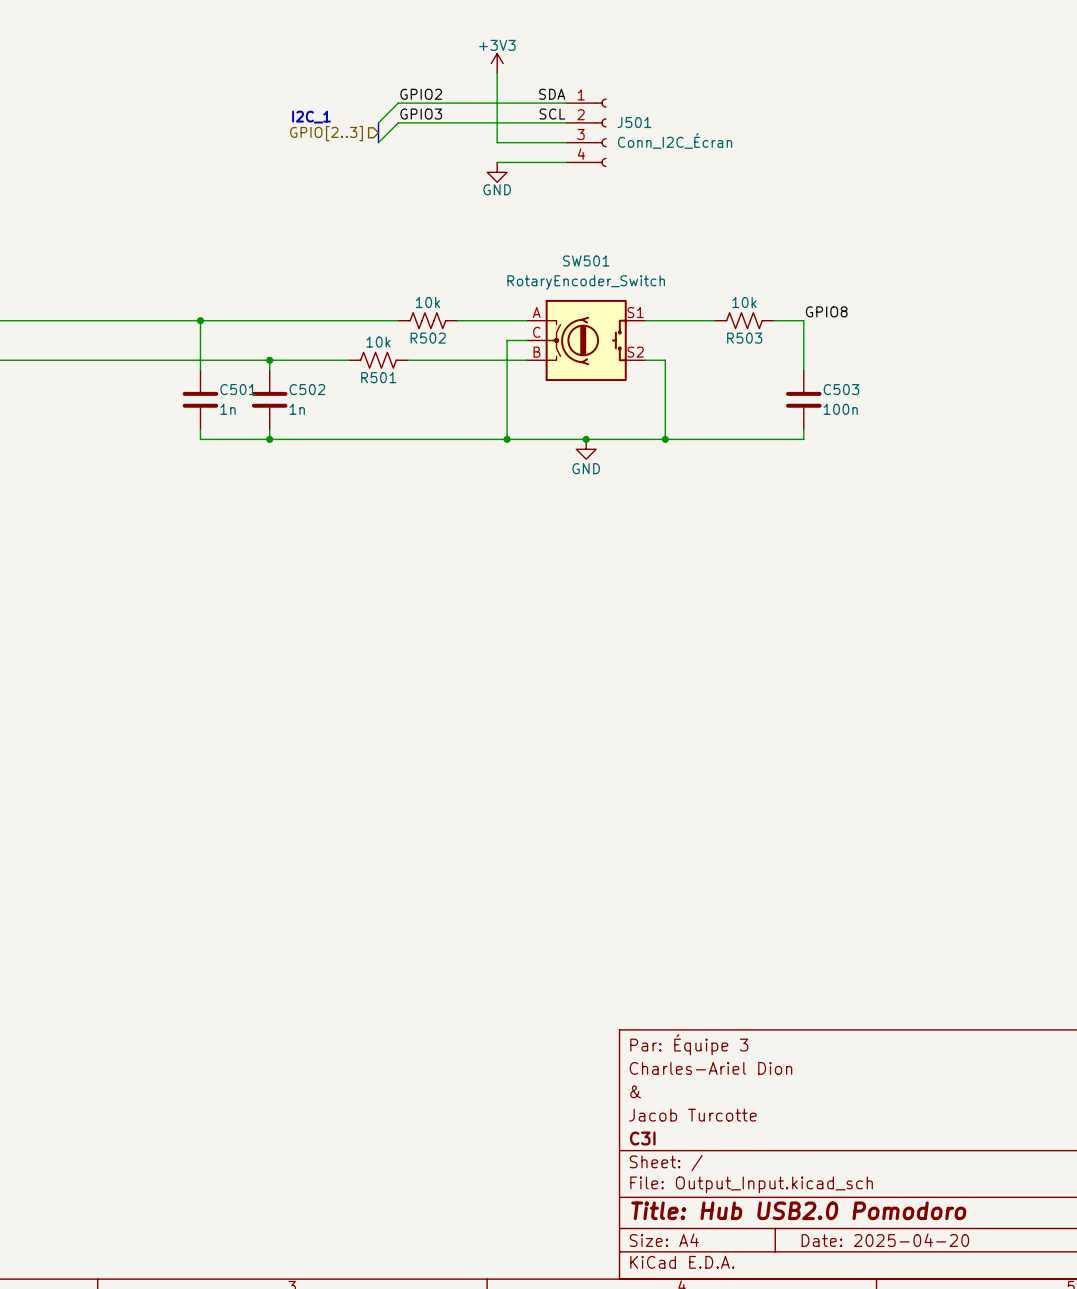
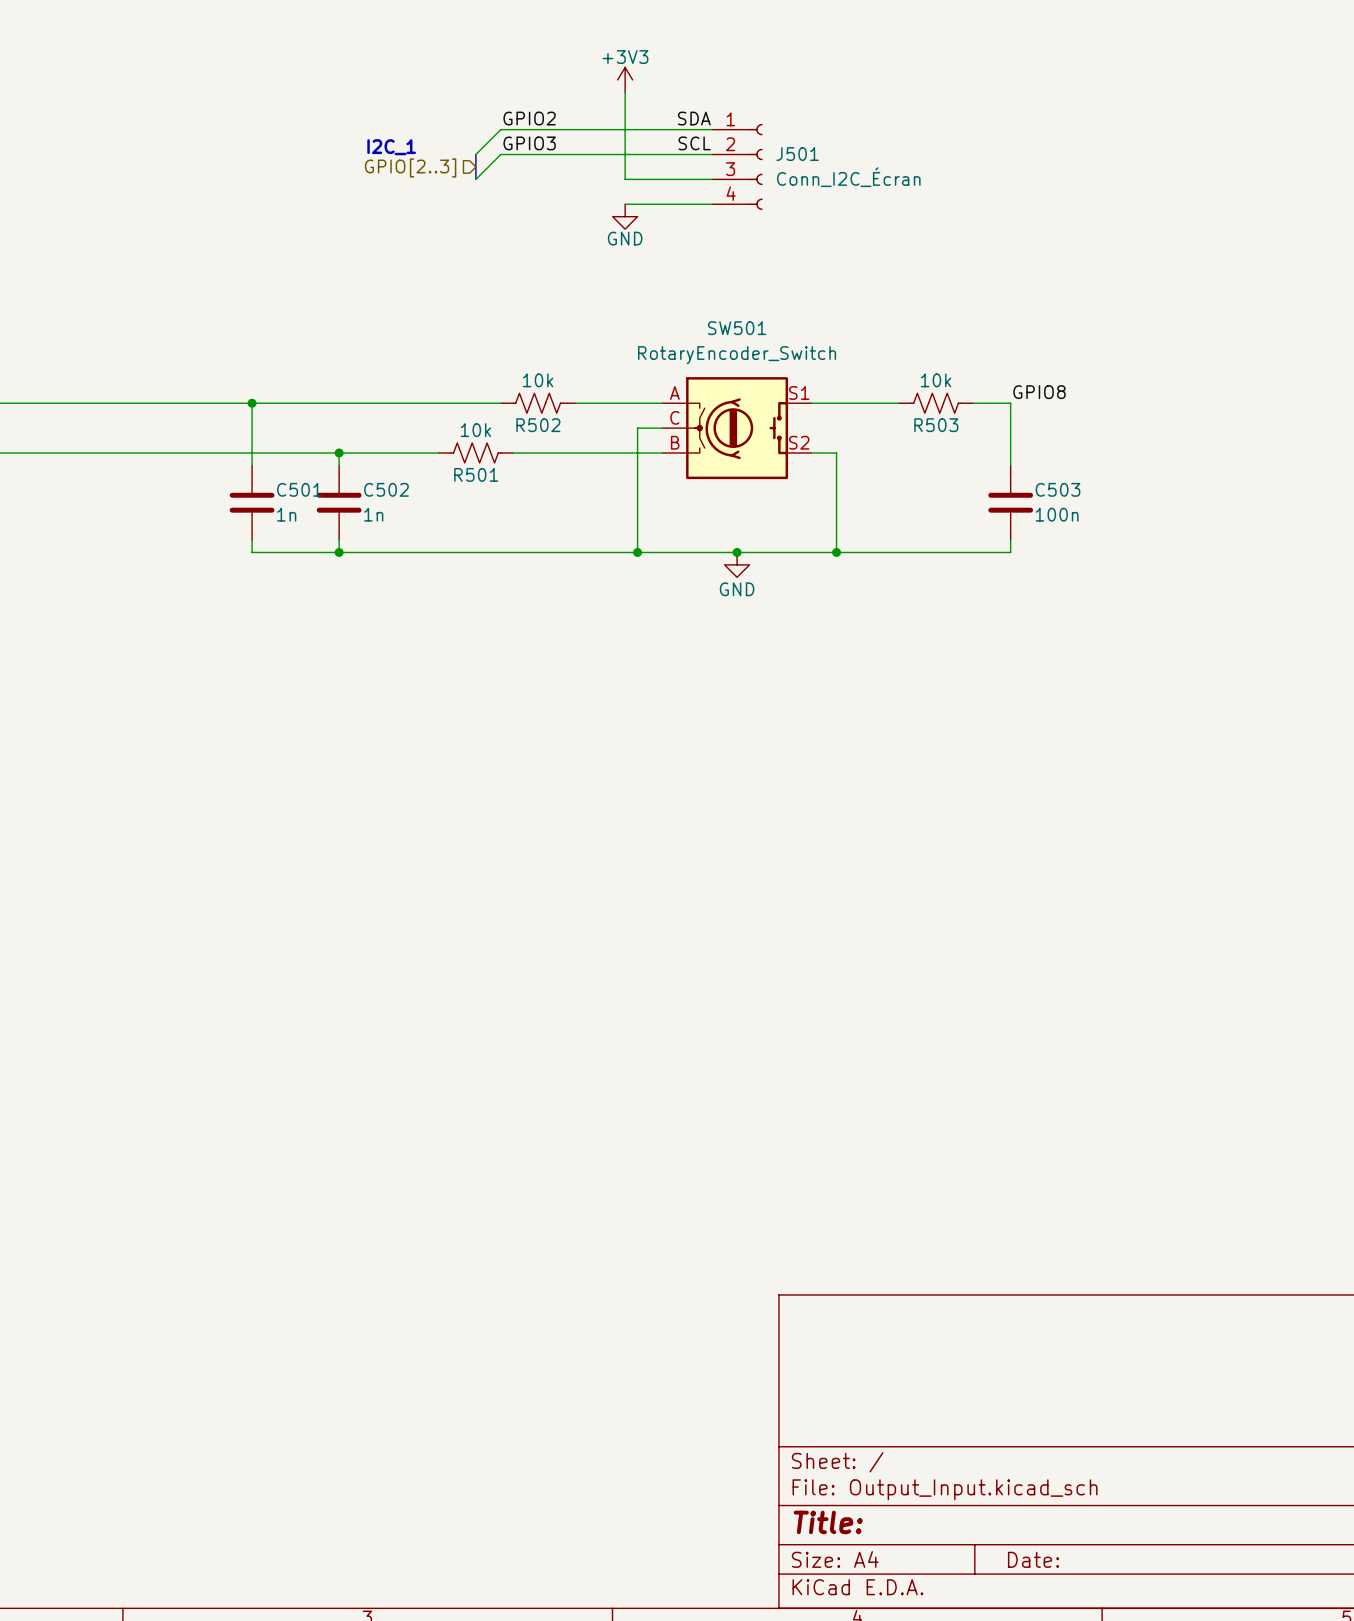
title block: Par: Équipe 3 (689, 1044) -> none
title block: Charles-Ariel Dion (710, 1068) -> none
title block: & (635, 1091) -> none
title block: Jacob Turcotte (692, 1115) -> none
title block: C3I (642, 1138) -> none
title block: Title: Hub USB2.0 Pomodoro (798, 1210) -> Title: (828, 1522)
title block: Date: 2025-04-20 (885, 1240) -> Date: (1033, 1559)

